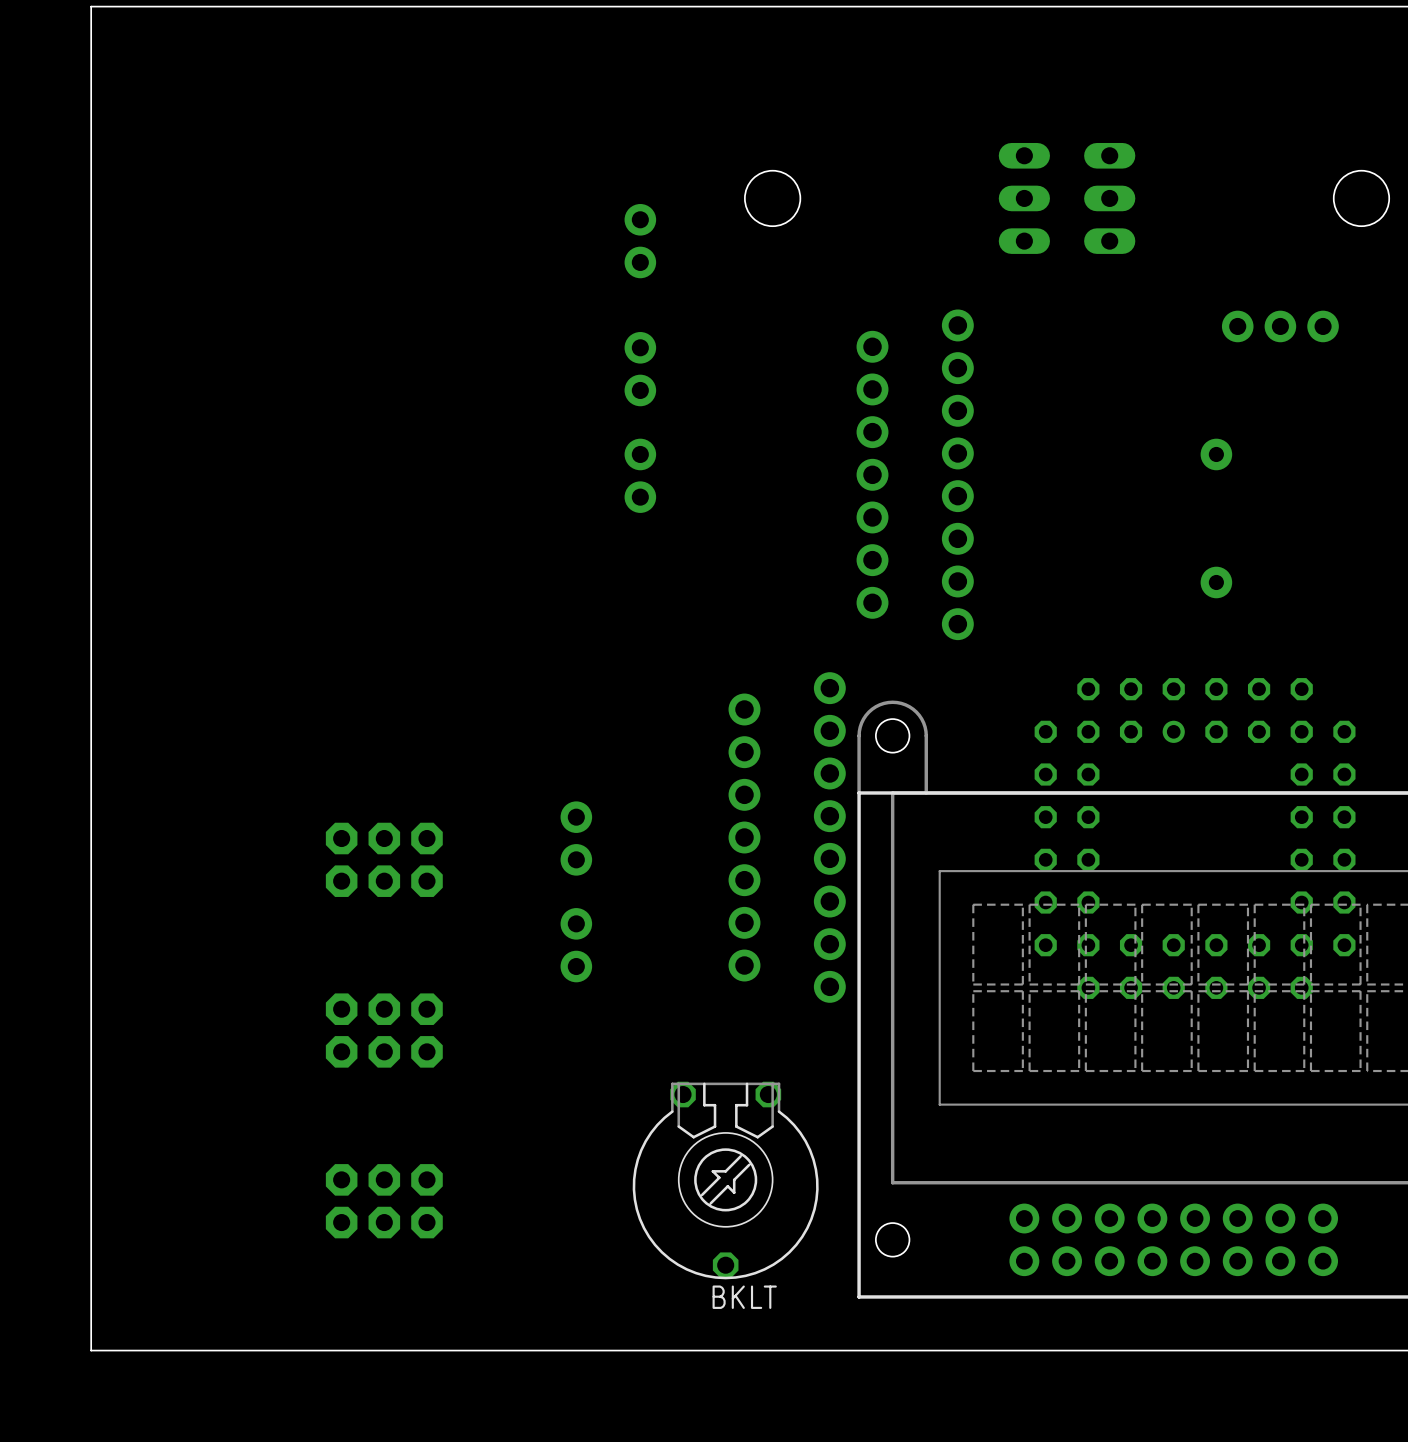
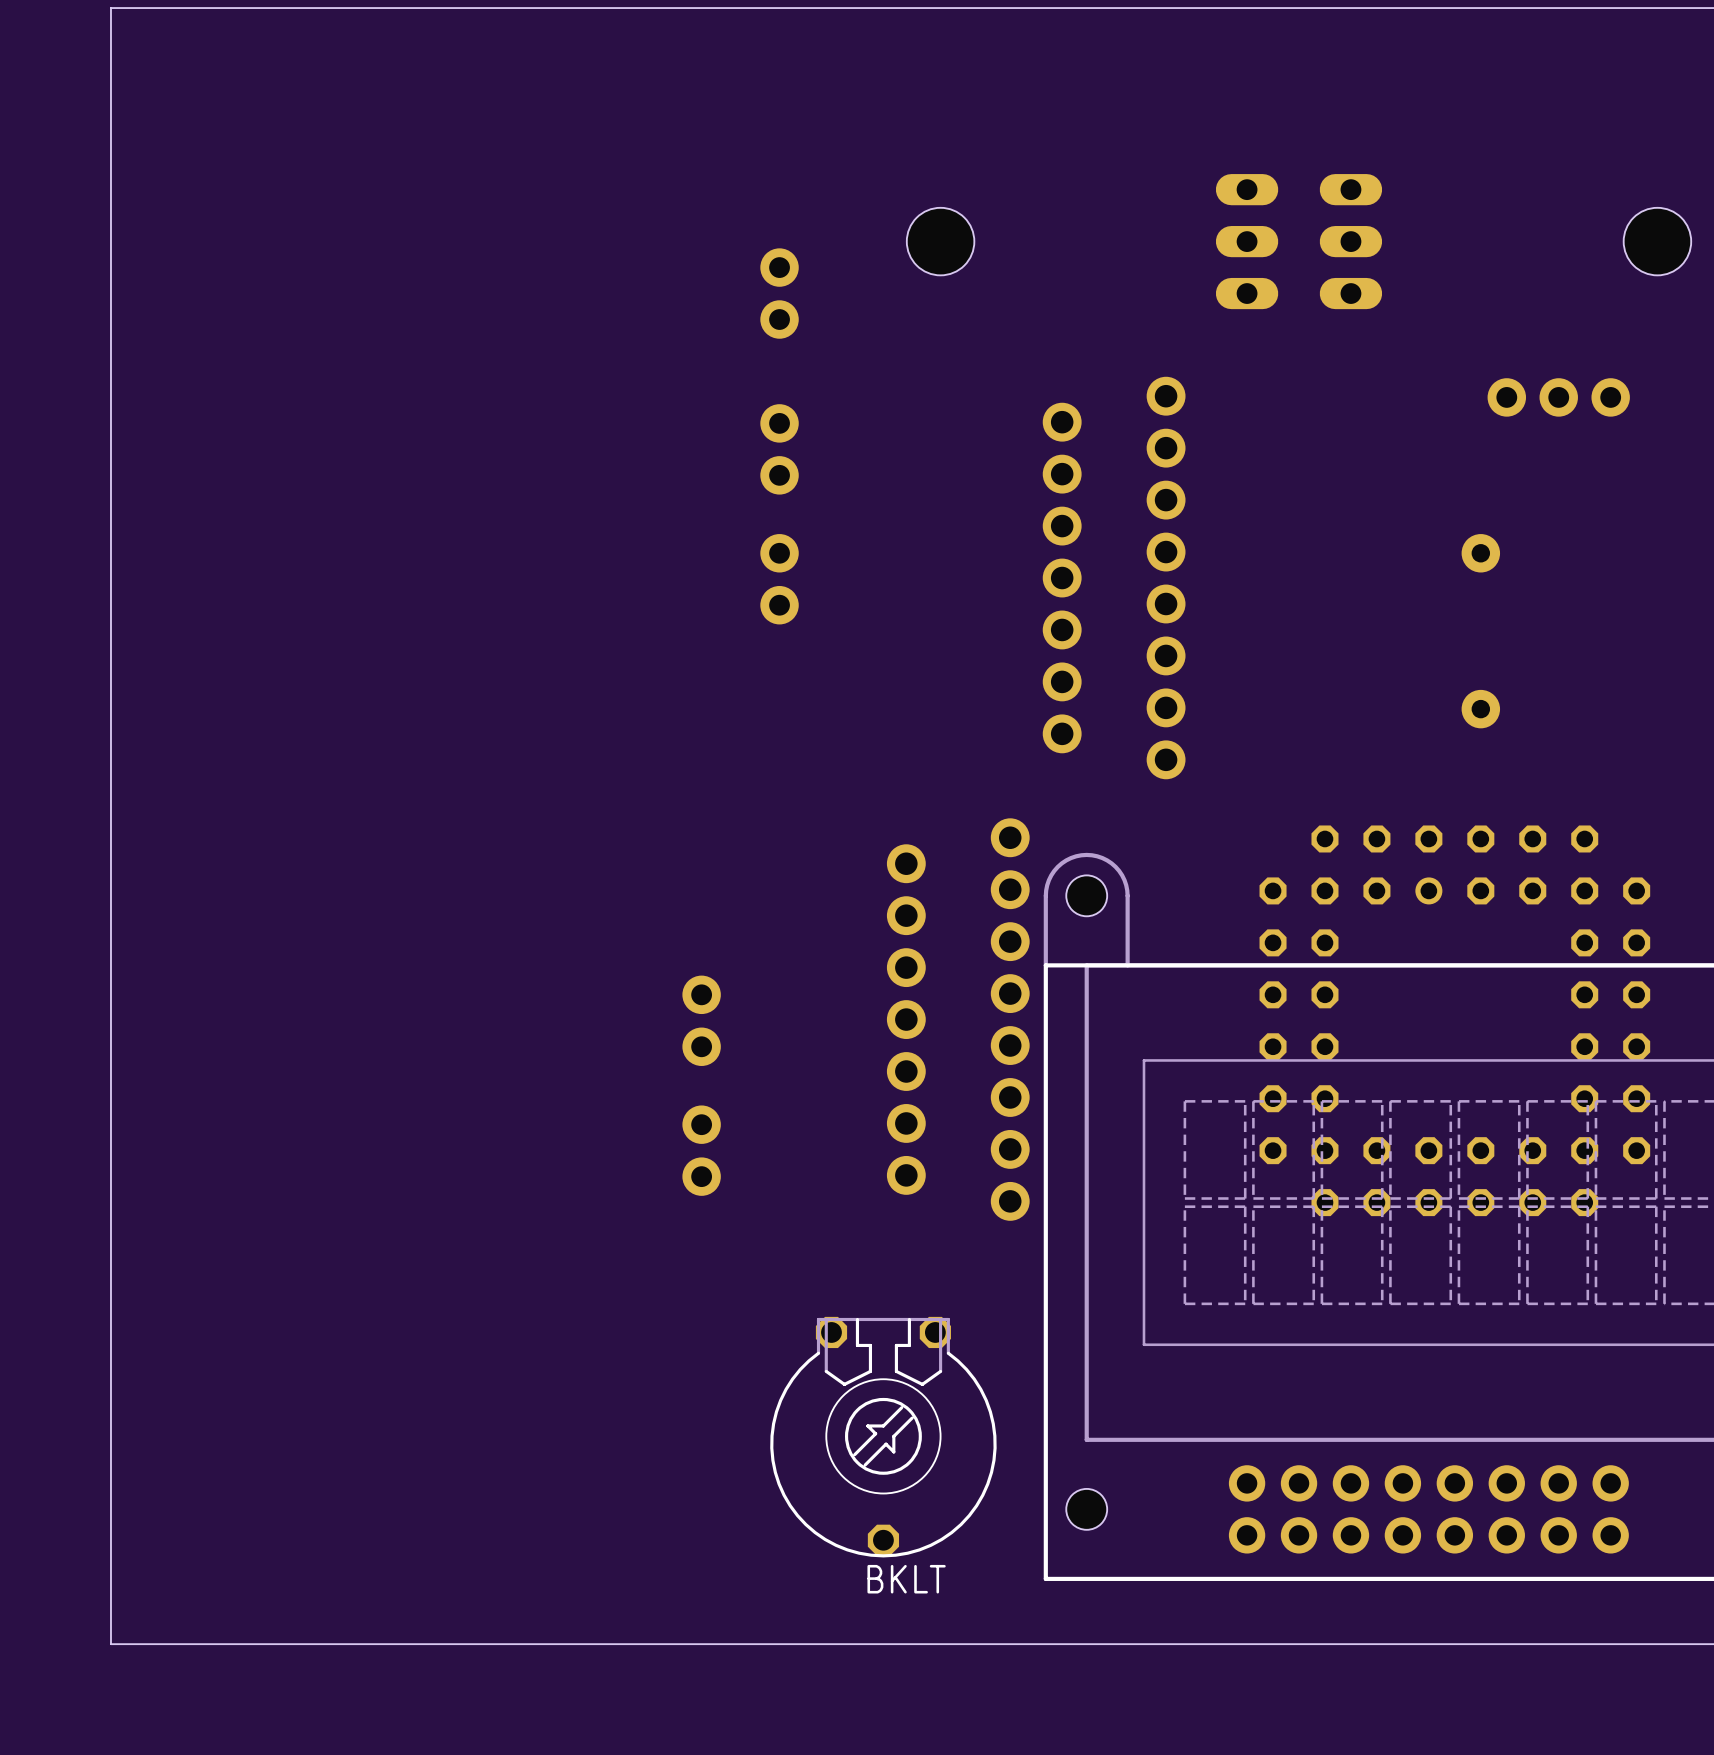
part: (384, 859) -> none
part: (384, 1030) -> none
part: (384, 1201) -> none

